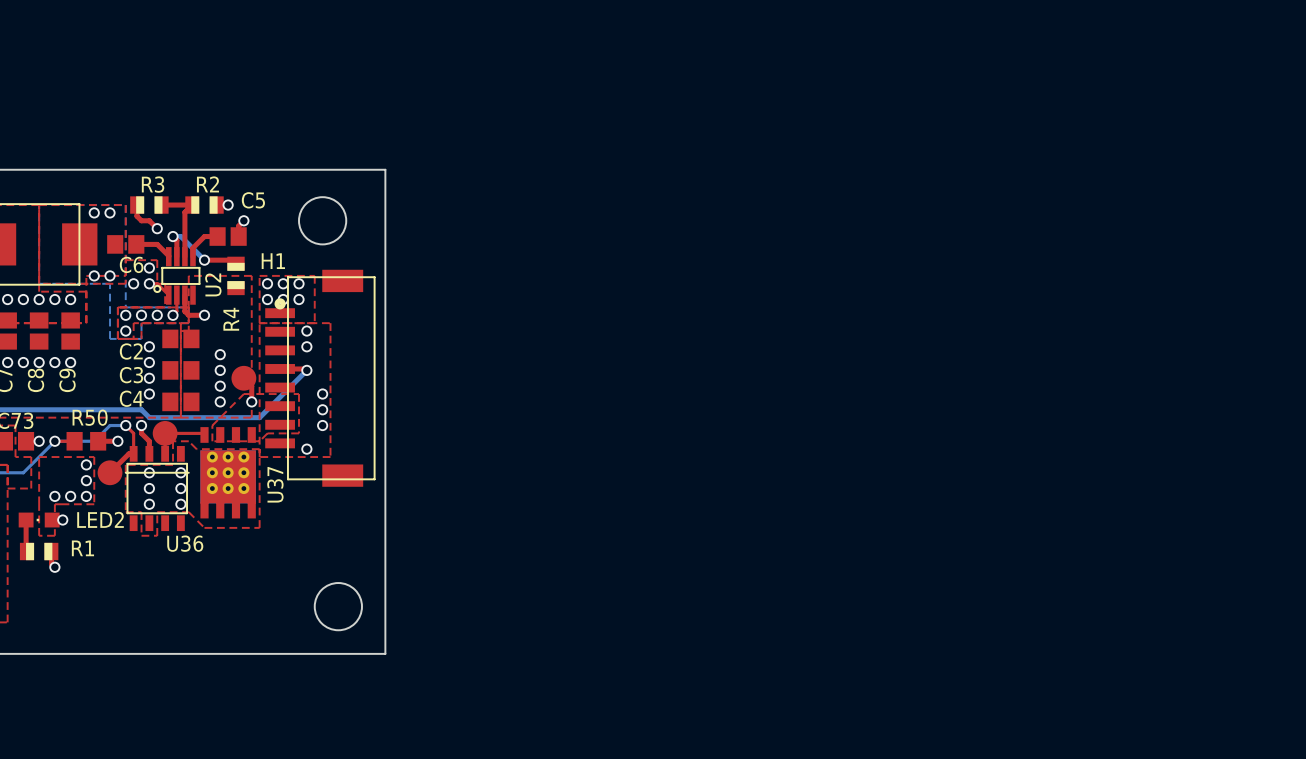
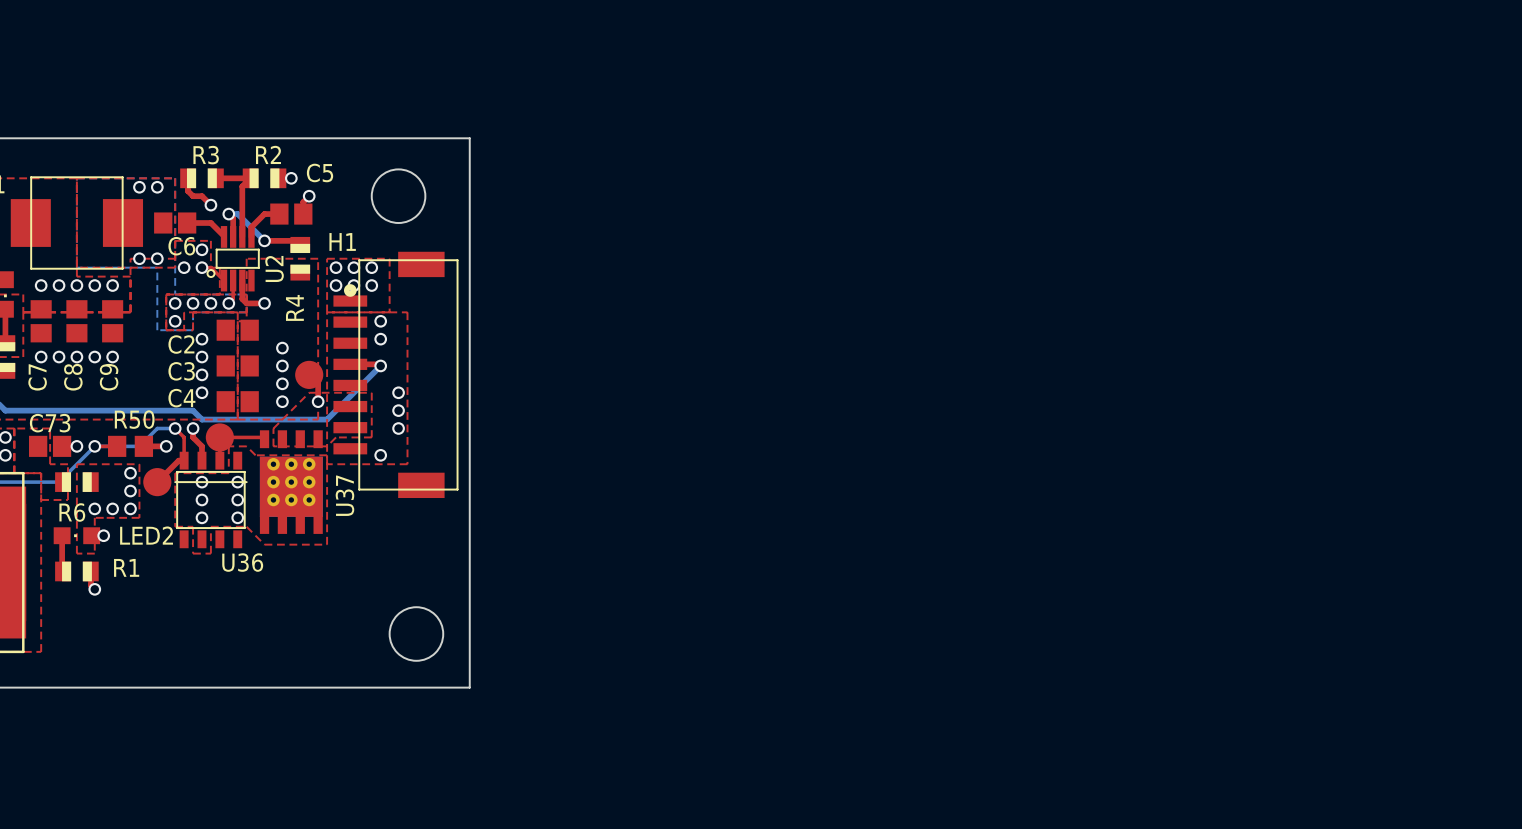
R6: none -> (76, 482)

